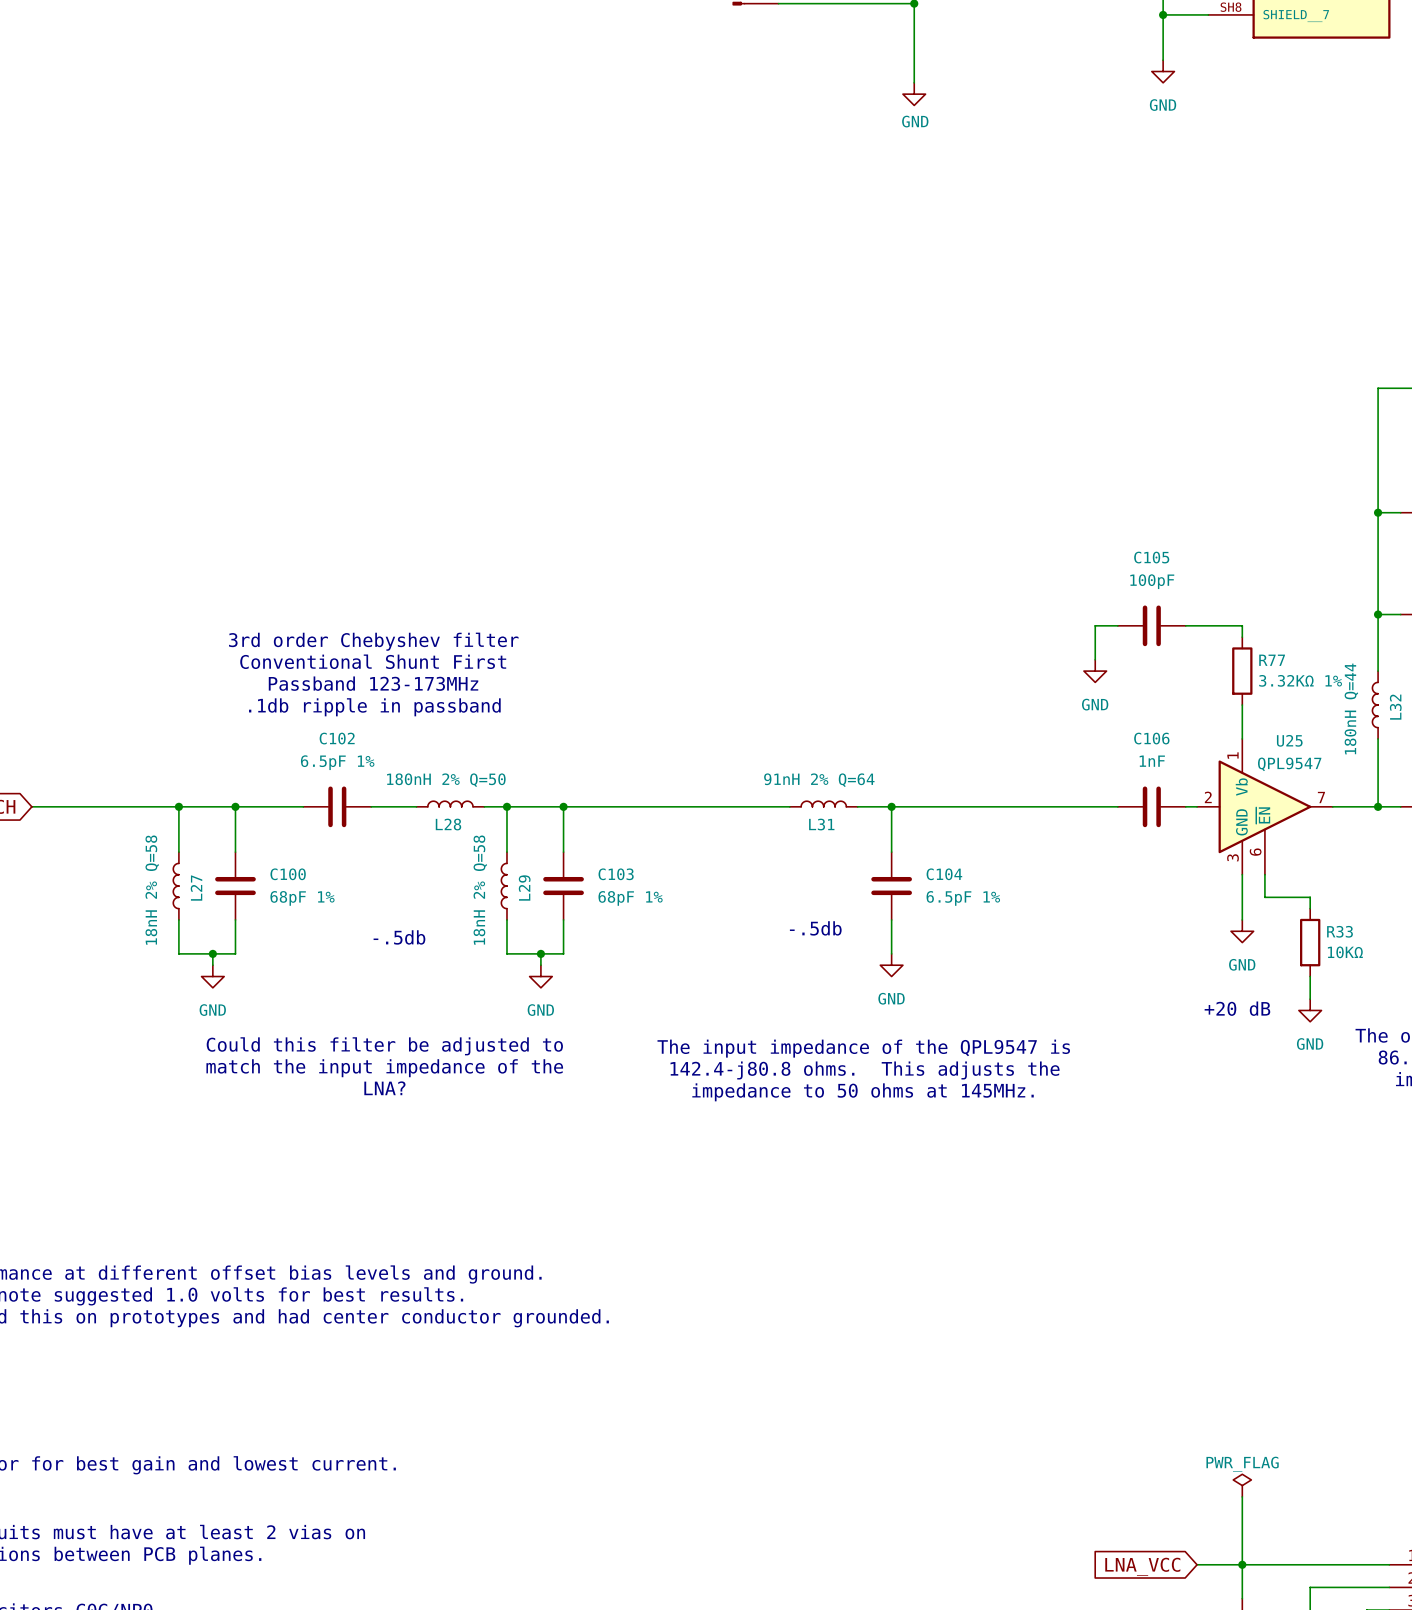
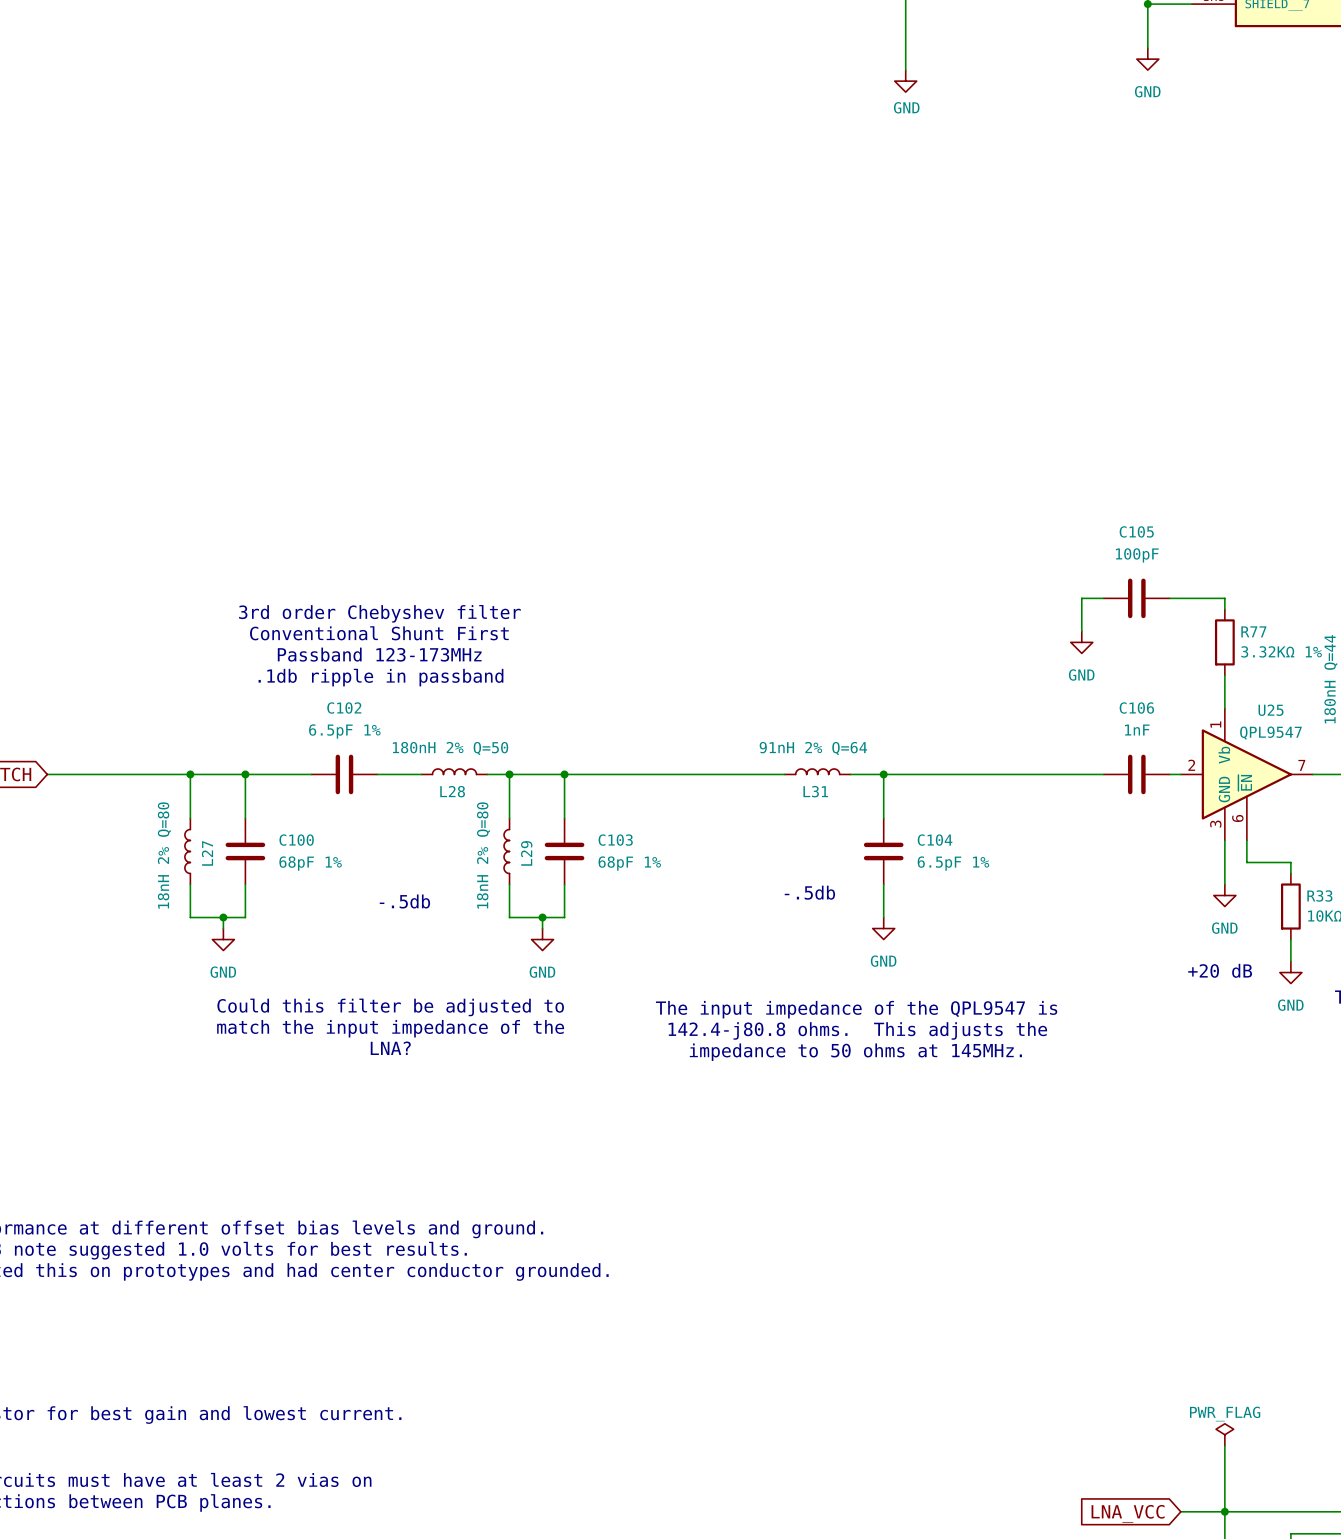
L27 value: 18nH 2% Q=58 (152, 890) -> 18nH 2% Q=80 (164, 855)
L29 value: 18nH 2% Q=58 (480, 890) -> 18nH 2% Q=80 (483, 855)

